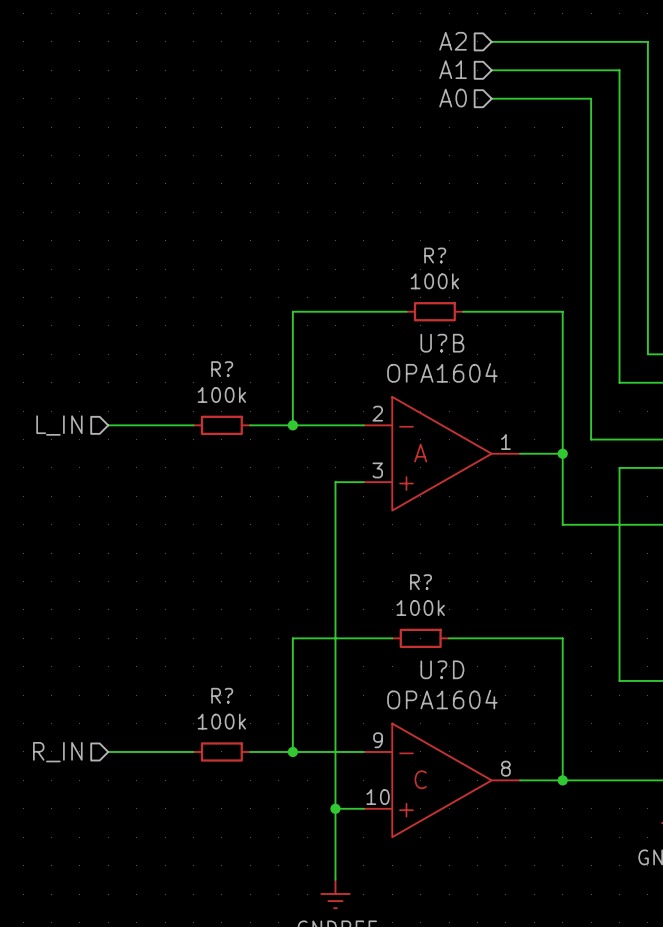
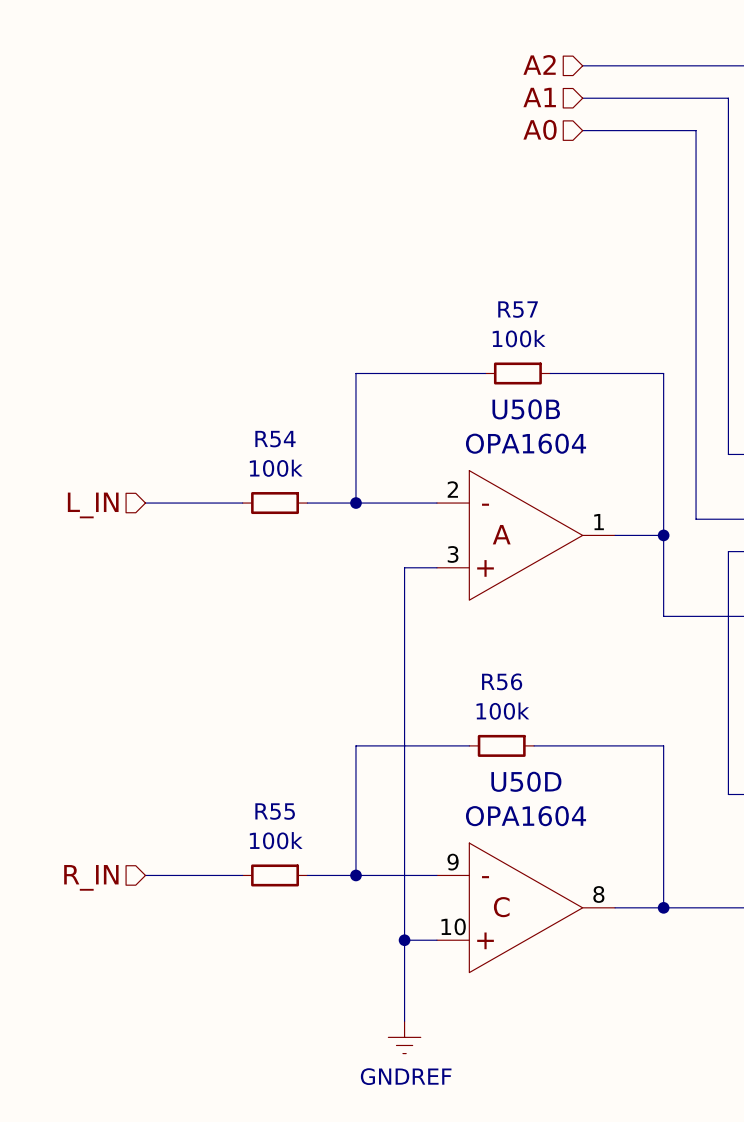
R? name: R? (435, 255) -> R57 (518, 309)
U?B name: U?B (442, 343) -> U50B (526, 409)
R? name: R? (222, 369) -> R54 (275, 439)
R? name: R? (421, 582) -> R56 (502, 681)
U?D name: U?D (442, 669) -> U50D (526, 781)
R? name: R? (222, 695) -> R55 (275, 811)

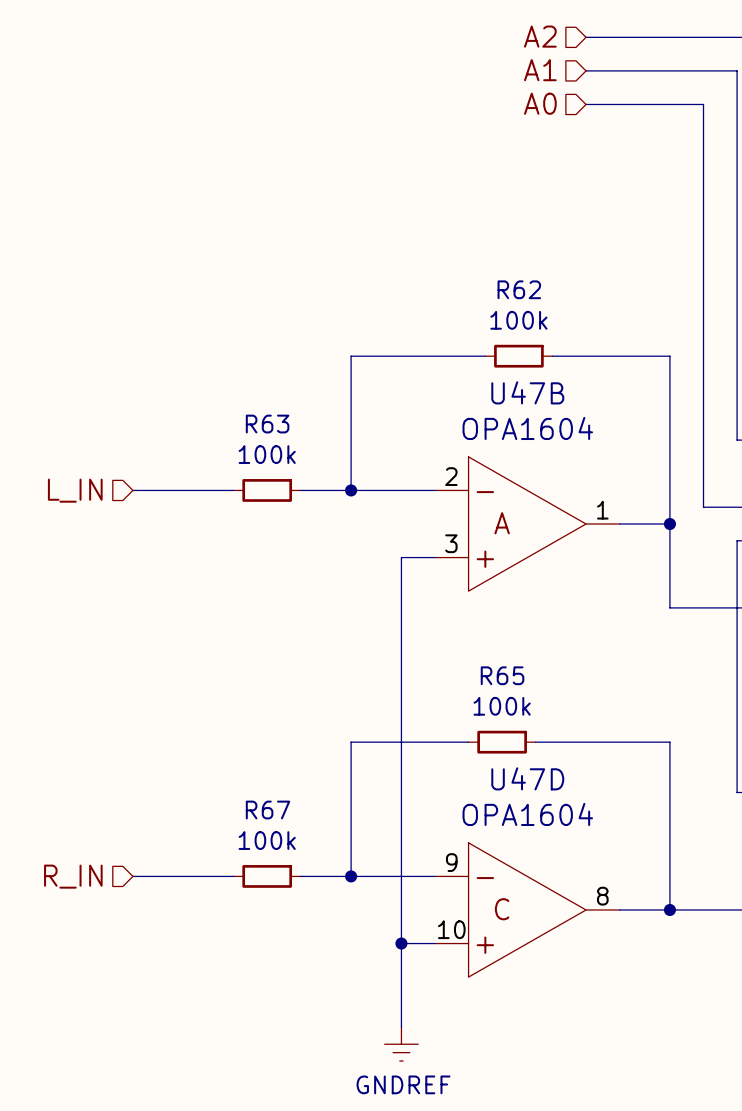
R57 name: R57 (518, 309) -> R62 (519, 289)
U50B name: U50B (526, 409) -> U47B (527, 392)
R54 name: R54 (275, 439) -> R63 (267, 424)
R56 name: R56 (502, 681) -> R65 (502, 675)
U50D name: U50D (526, 781) -> U47D (527, 778)
R55 name: R55 (275, 811) -> R67 (267, 810)

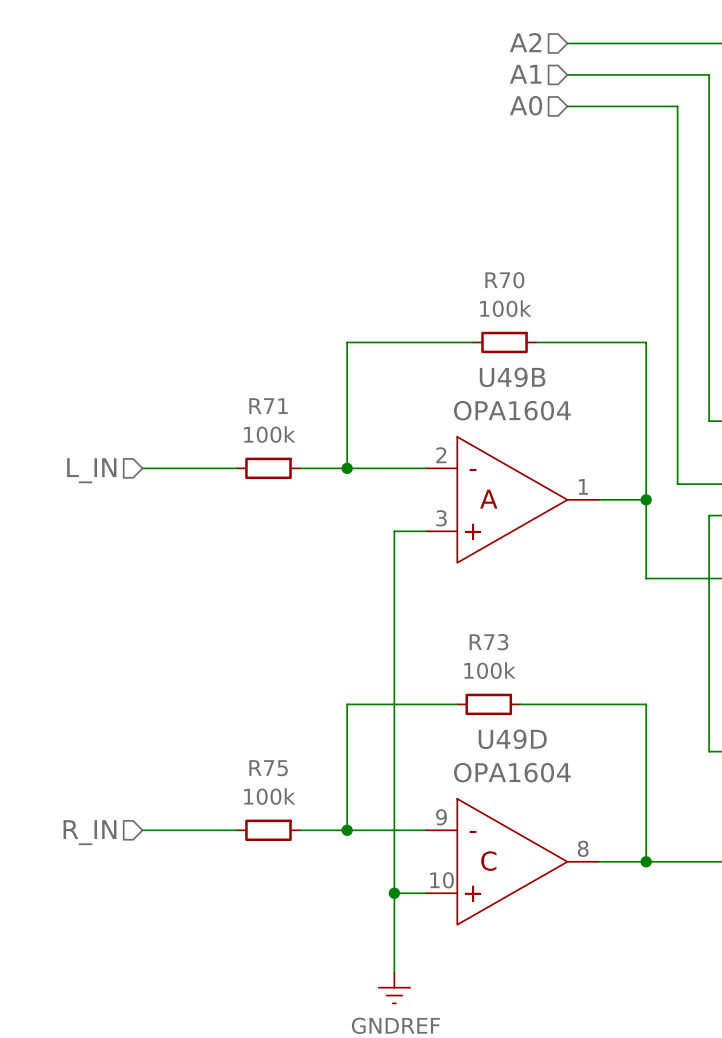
R62 name: R62 (519, 289) -> R70 (504, 280)
U47B name: U47B (527, 392) -> U49B (512, 377)
R63 name: R63 (267, 424) -> R71 (268, 406)
R65 name: R65 (502, 675) -> R73 (488, 642)
U47D name: U47D (527, 778) -> U49D (512, 739)
R67 name: R67 (267, 810) -> R75 (268, 768)

